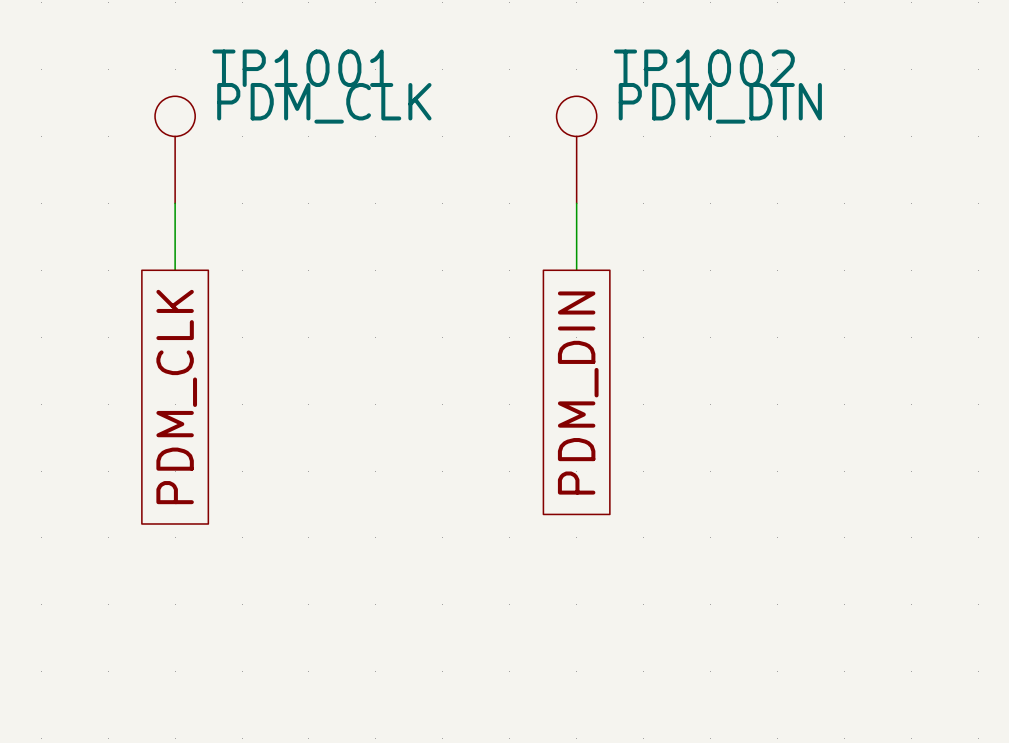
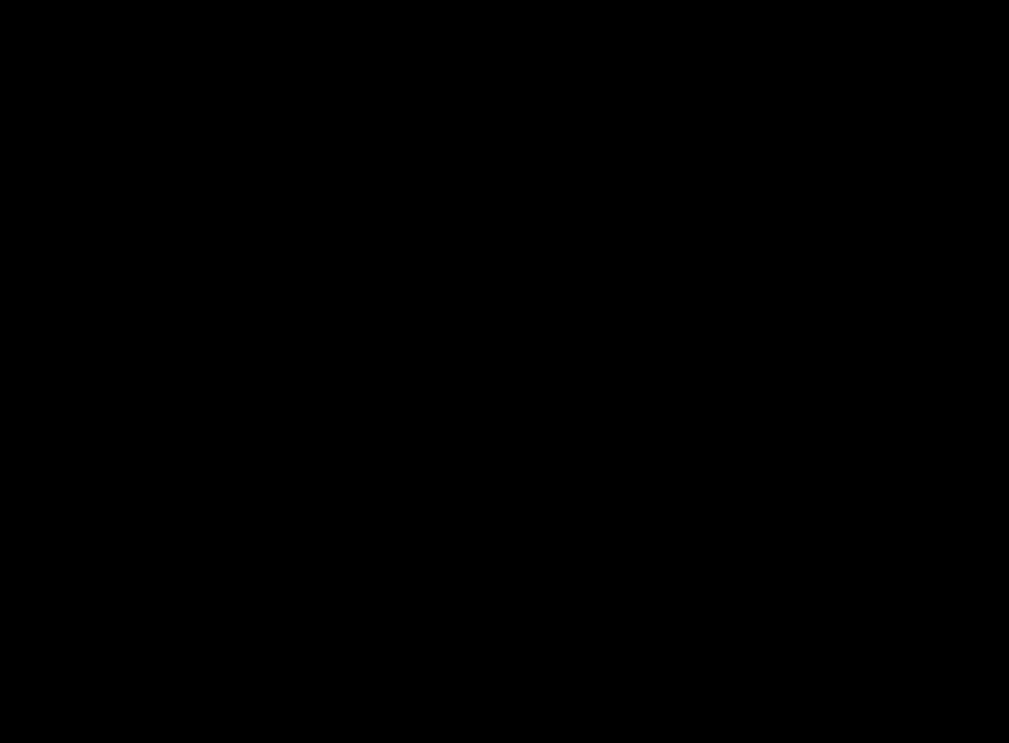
TP1001: PDM_CLK (175, 149) -> none
TP1002: PDM_DIN (576, 149) -> none
wire: (175, 203) (175, 270) -> none
wire: (576, 203) (576, 270) -> none
global label: PDM_DIN (578, 393) -> none
global label: PDM_CLK (176, 397) -> none

